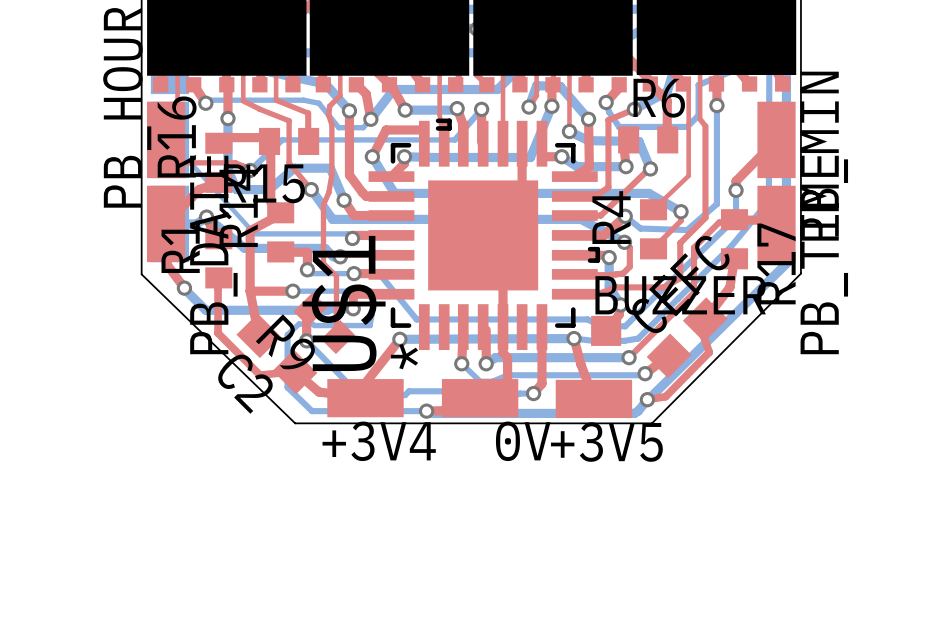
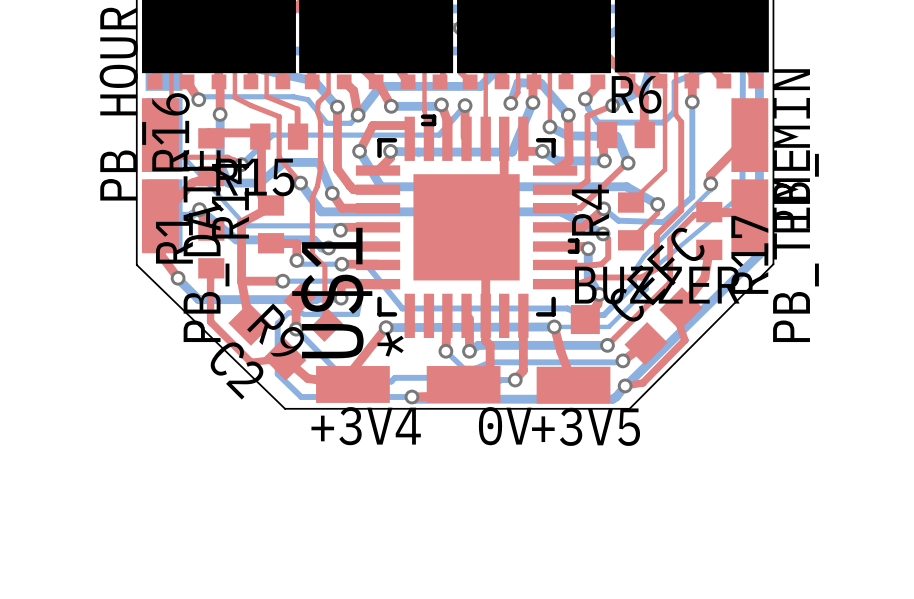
bottom track: (736, 196) (736, 217) (656, 295) -> (710, 189) (644, 256) (634, 270) (634, 284)
bottom track: (768, 201) (731, 246) (638, 338) (624, 340) (574, 338) -> (742, 194) (646, 274) (646, 289) (608, 326) (554, 326)

